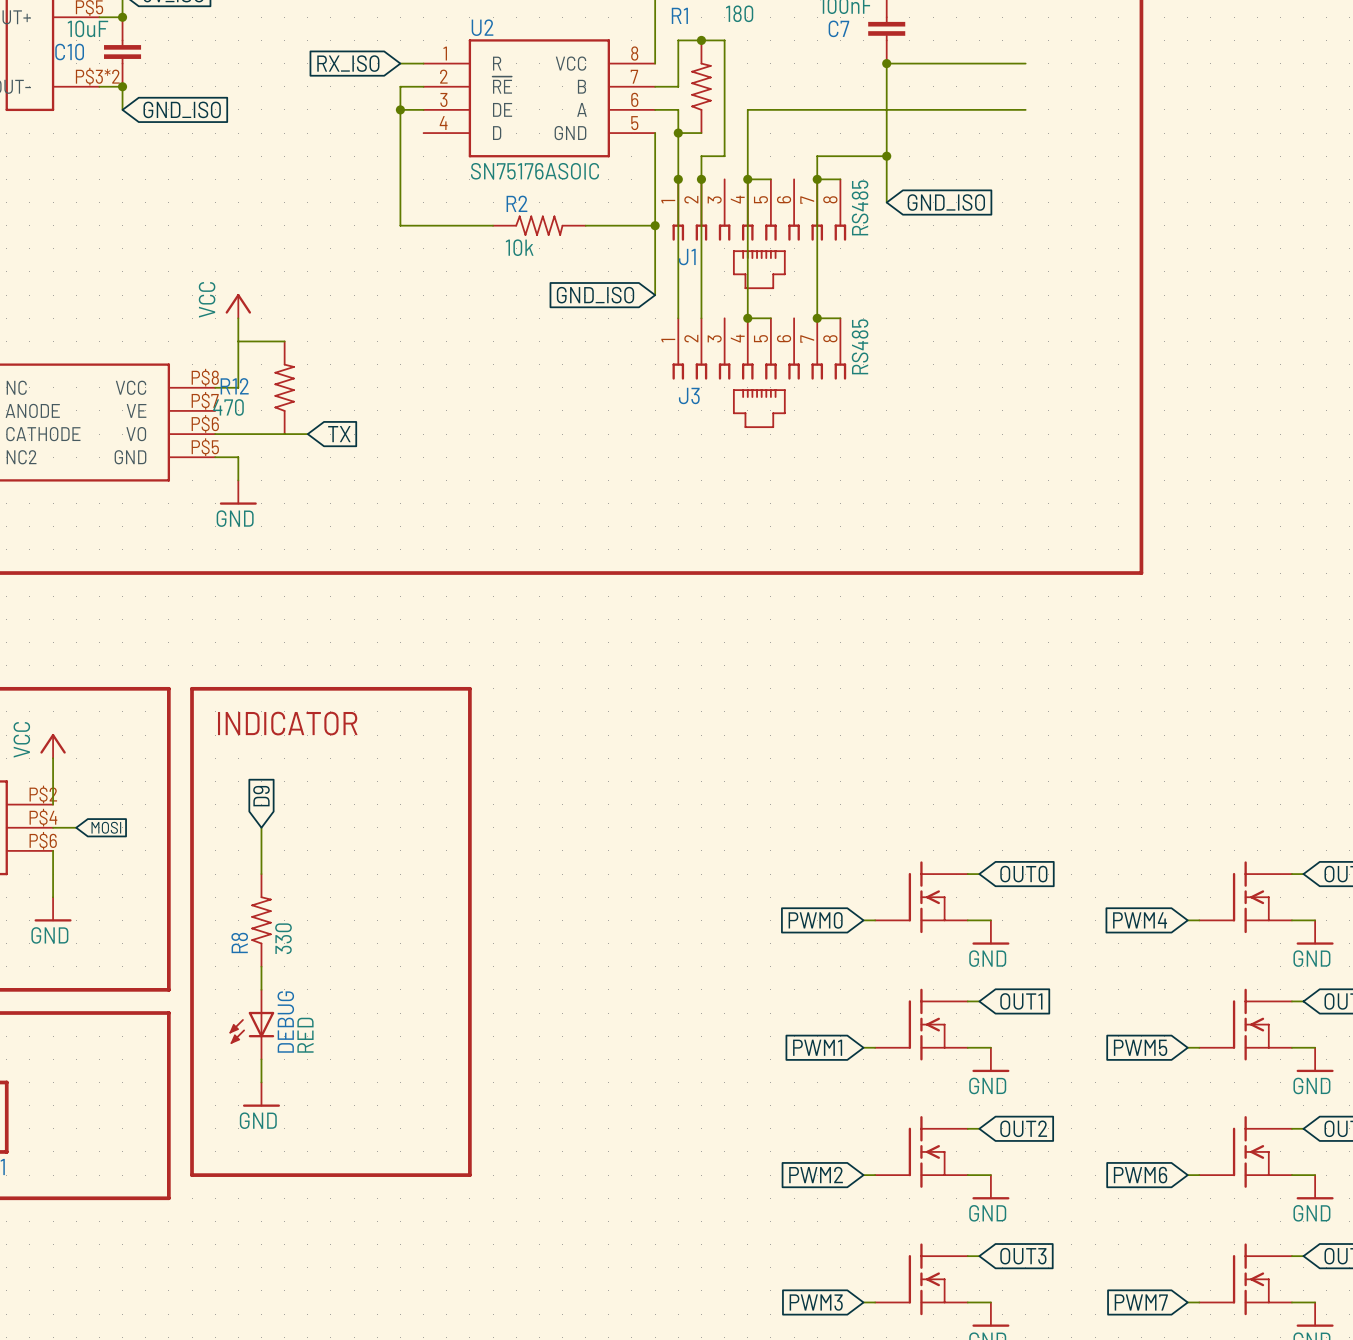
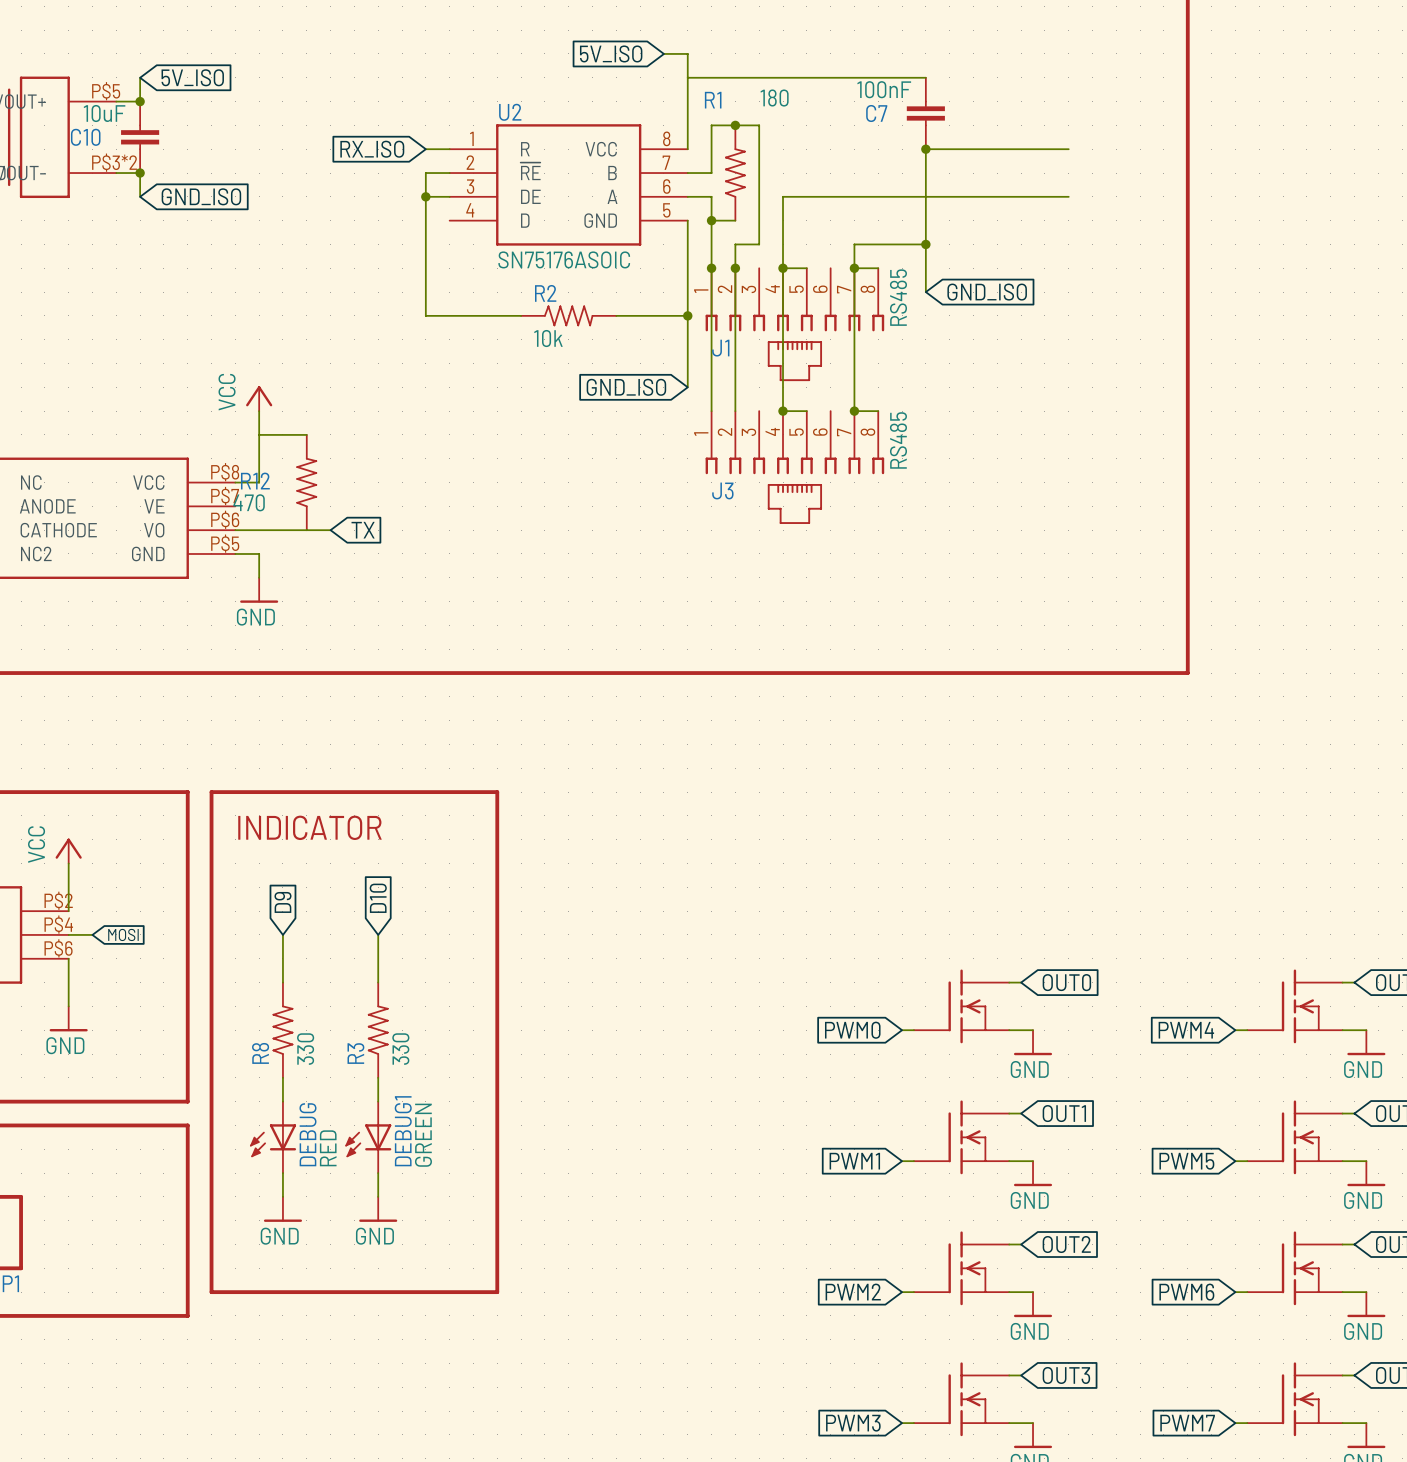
global label: none -> D10 (378, 898)
wire: none -> (378, 934) (378, 982)
R3: none -> 330 (378, 1030)
wire: none -> (378, 1077) (378, 1101)
DEBUG1: none -> GREEN (368, 1137)
wire: none -> (378, 1173) (378, 1196)
power symbol: none -> GND (378, 1209)

